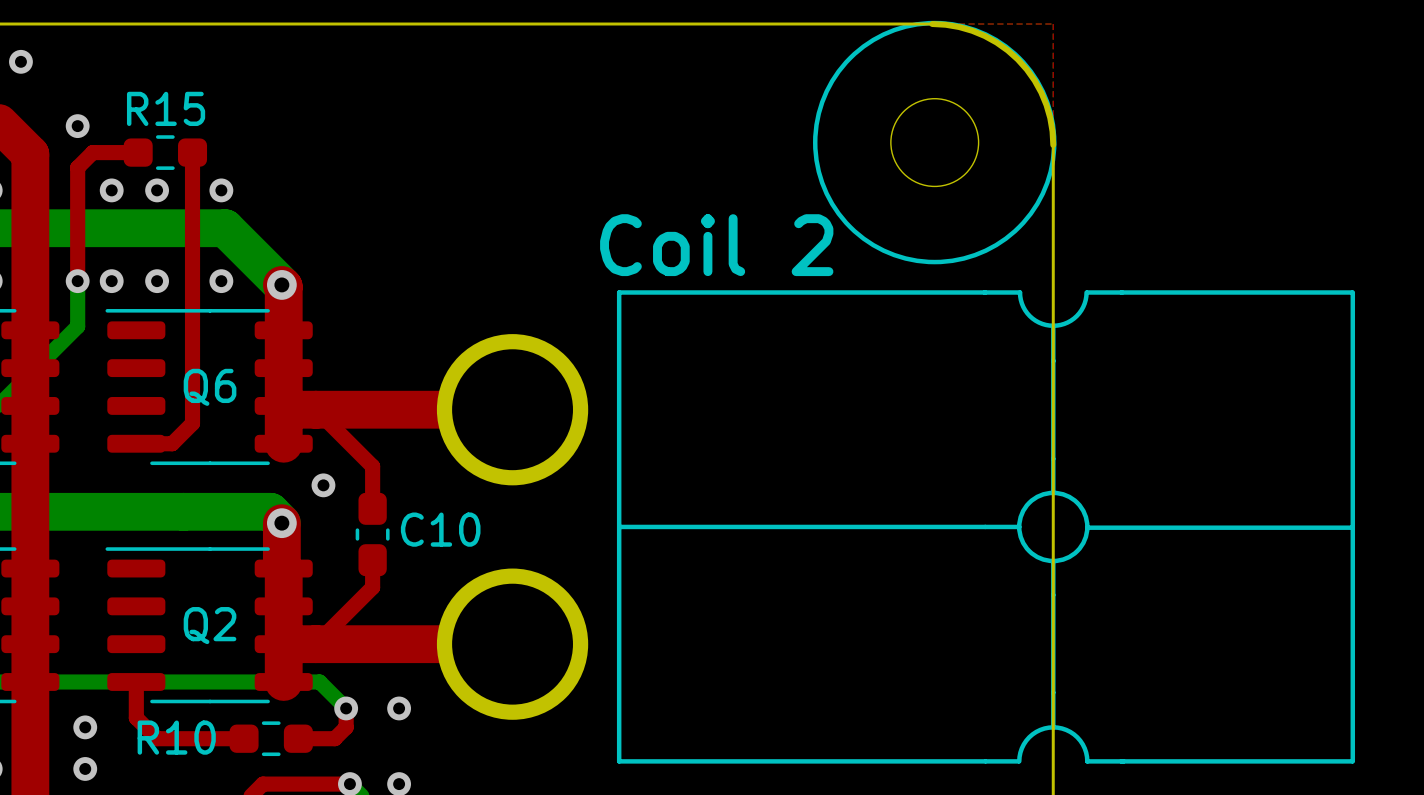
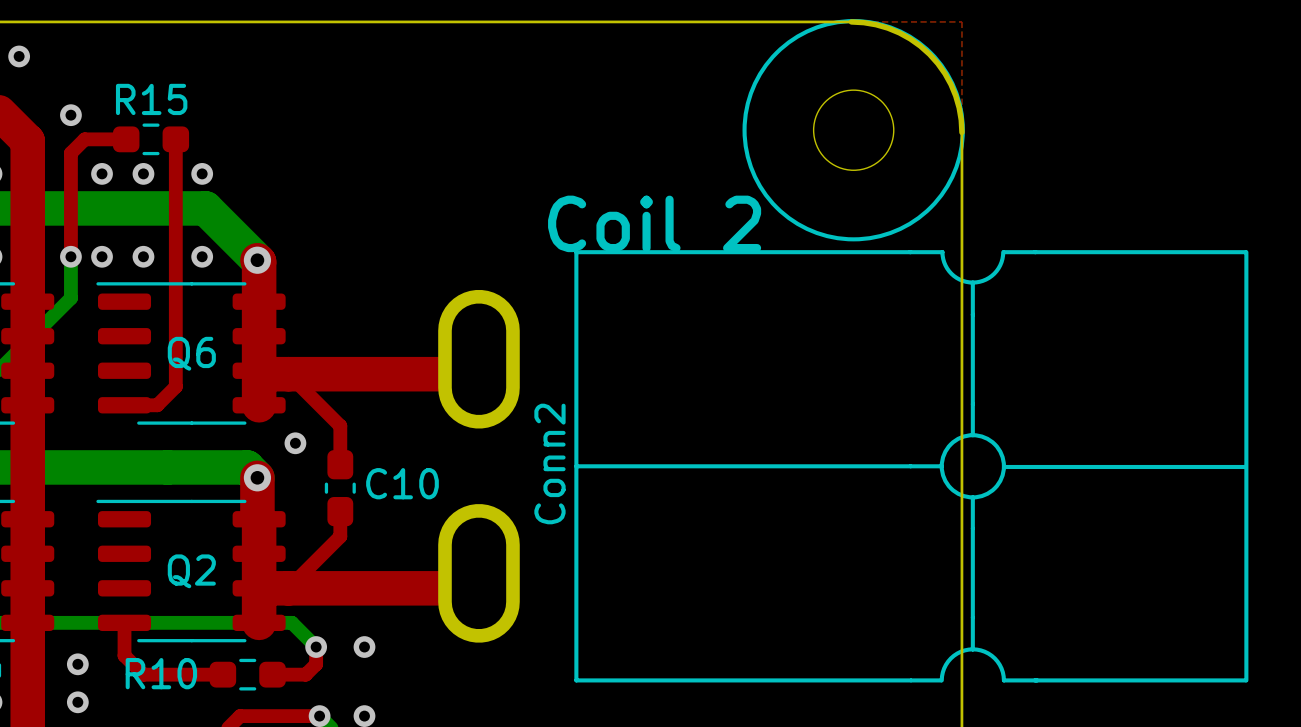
Conn2: none -> (843, 466)
part: (895, 526) -> none

